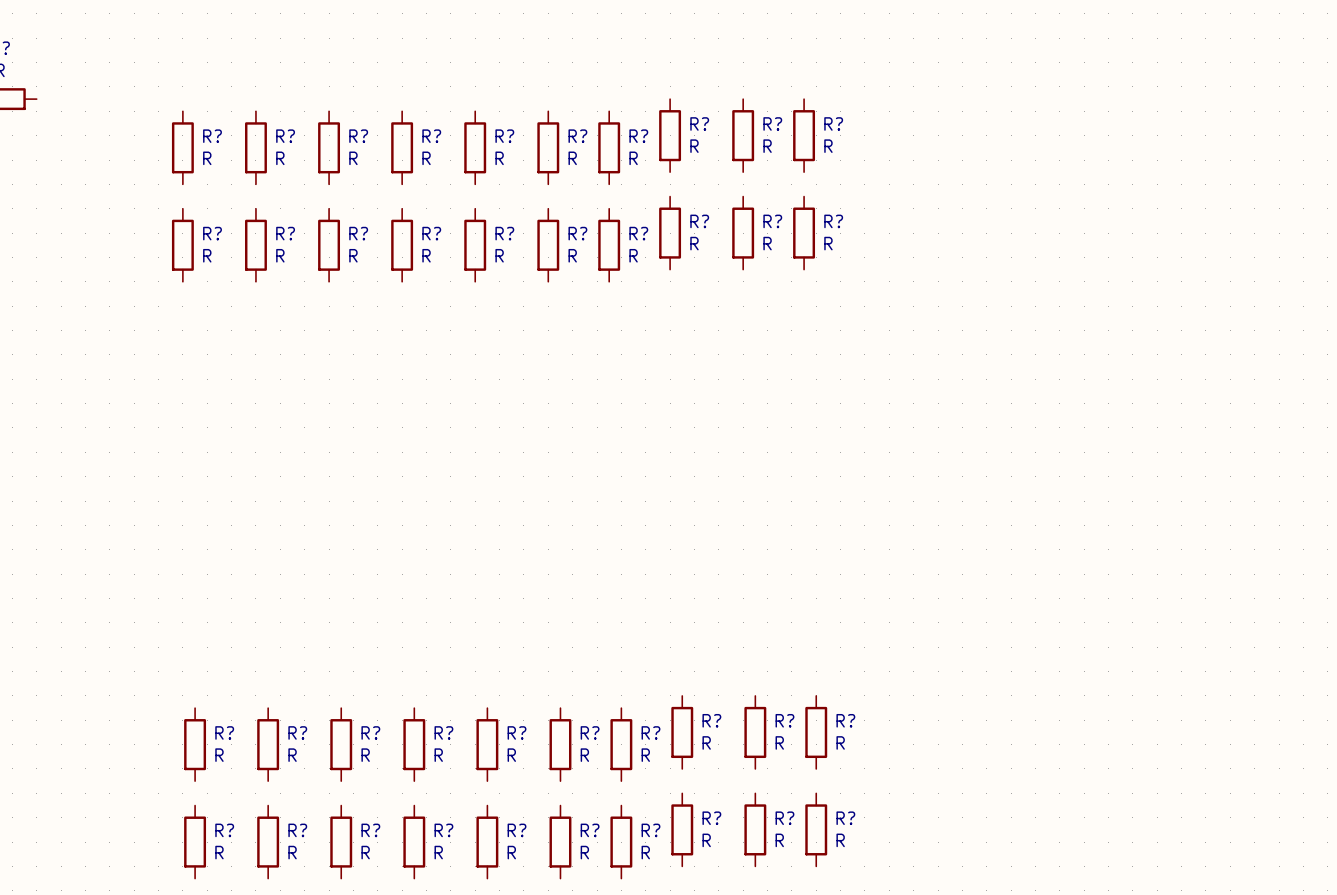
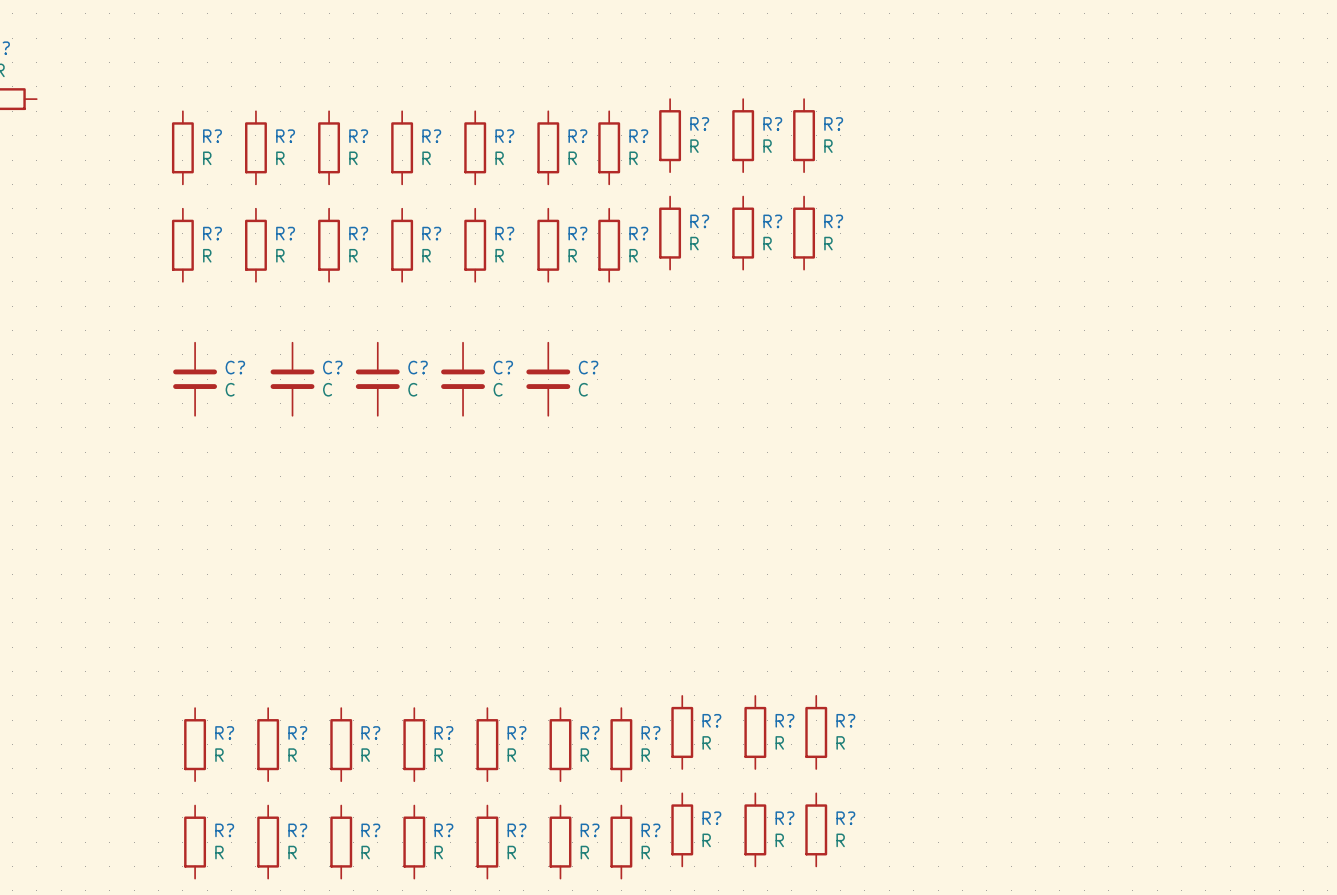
C?: none -> C (195, 379)
C?: none -> C (292, 379)
C?: none -> C (377, 379)
C?: none -> C (463, 379)
C?: none -> C (548, 379)

